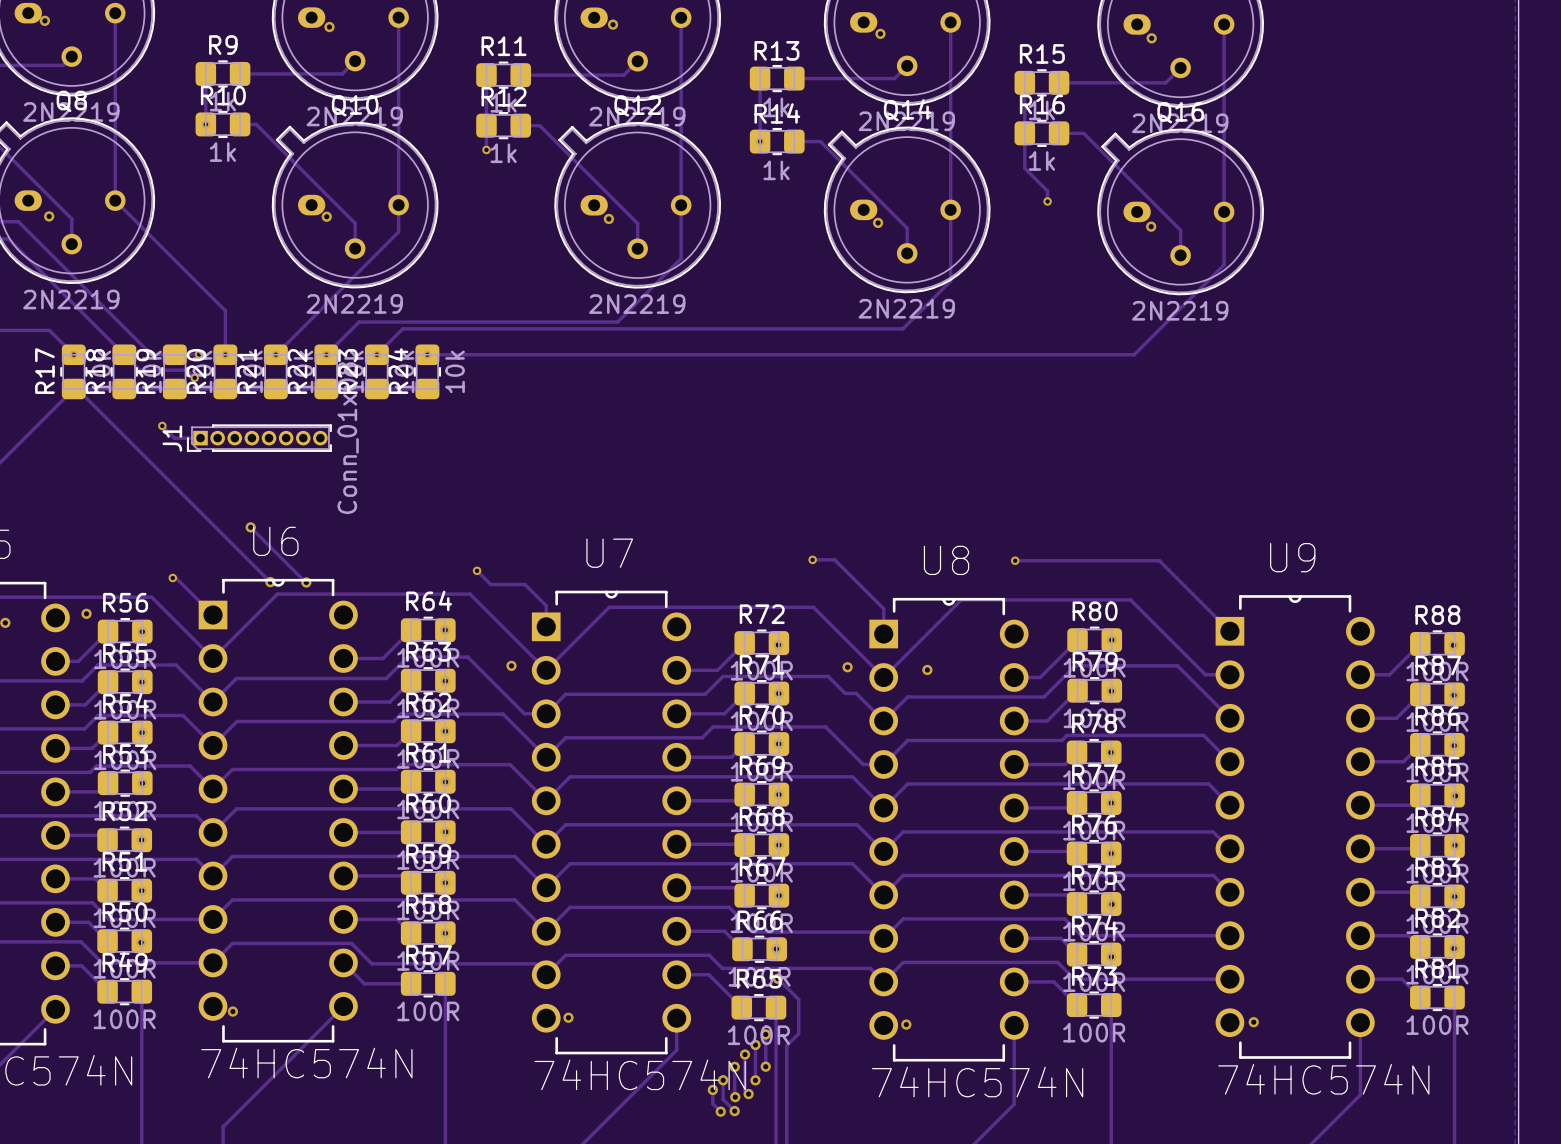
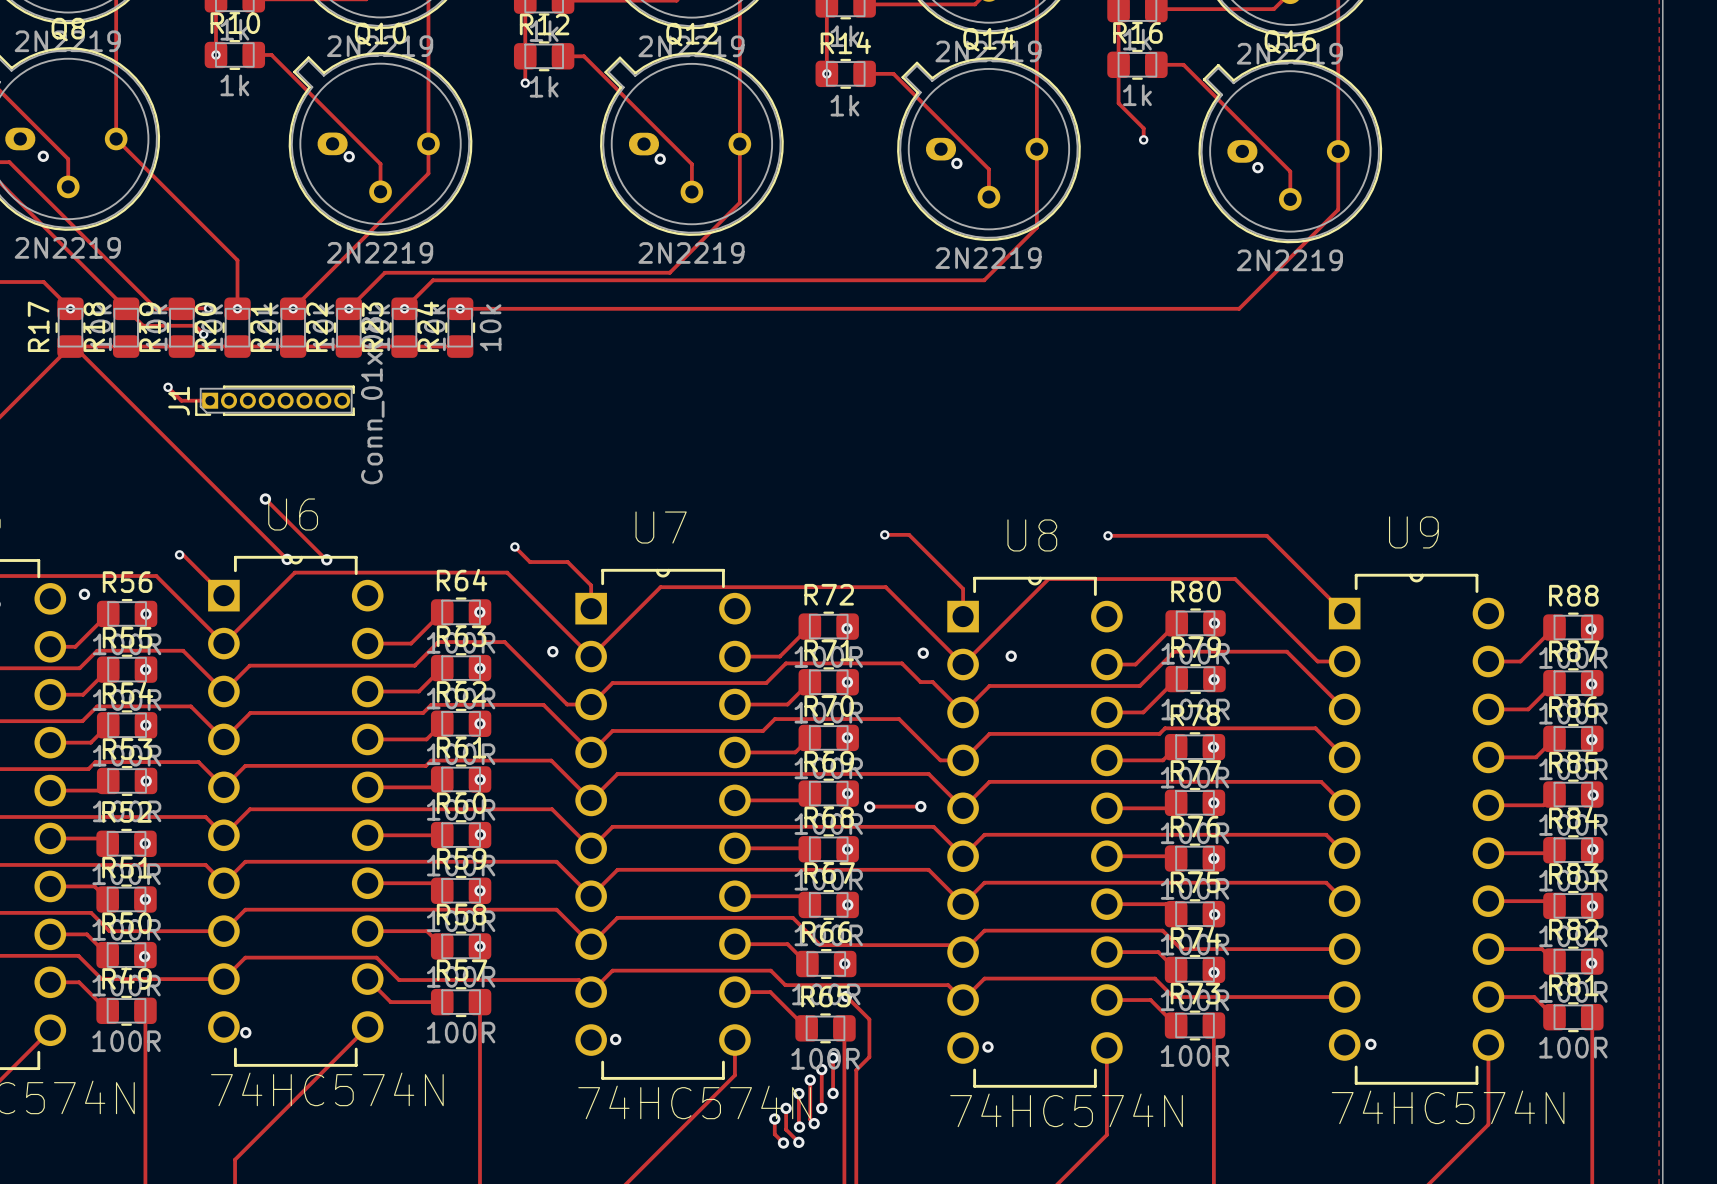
via: none -> (869, 807)
track: none -> (920, 806) (869, 807)
via: none -> (920, 806)

